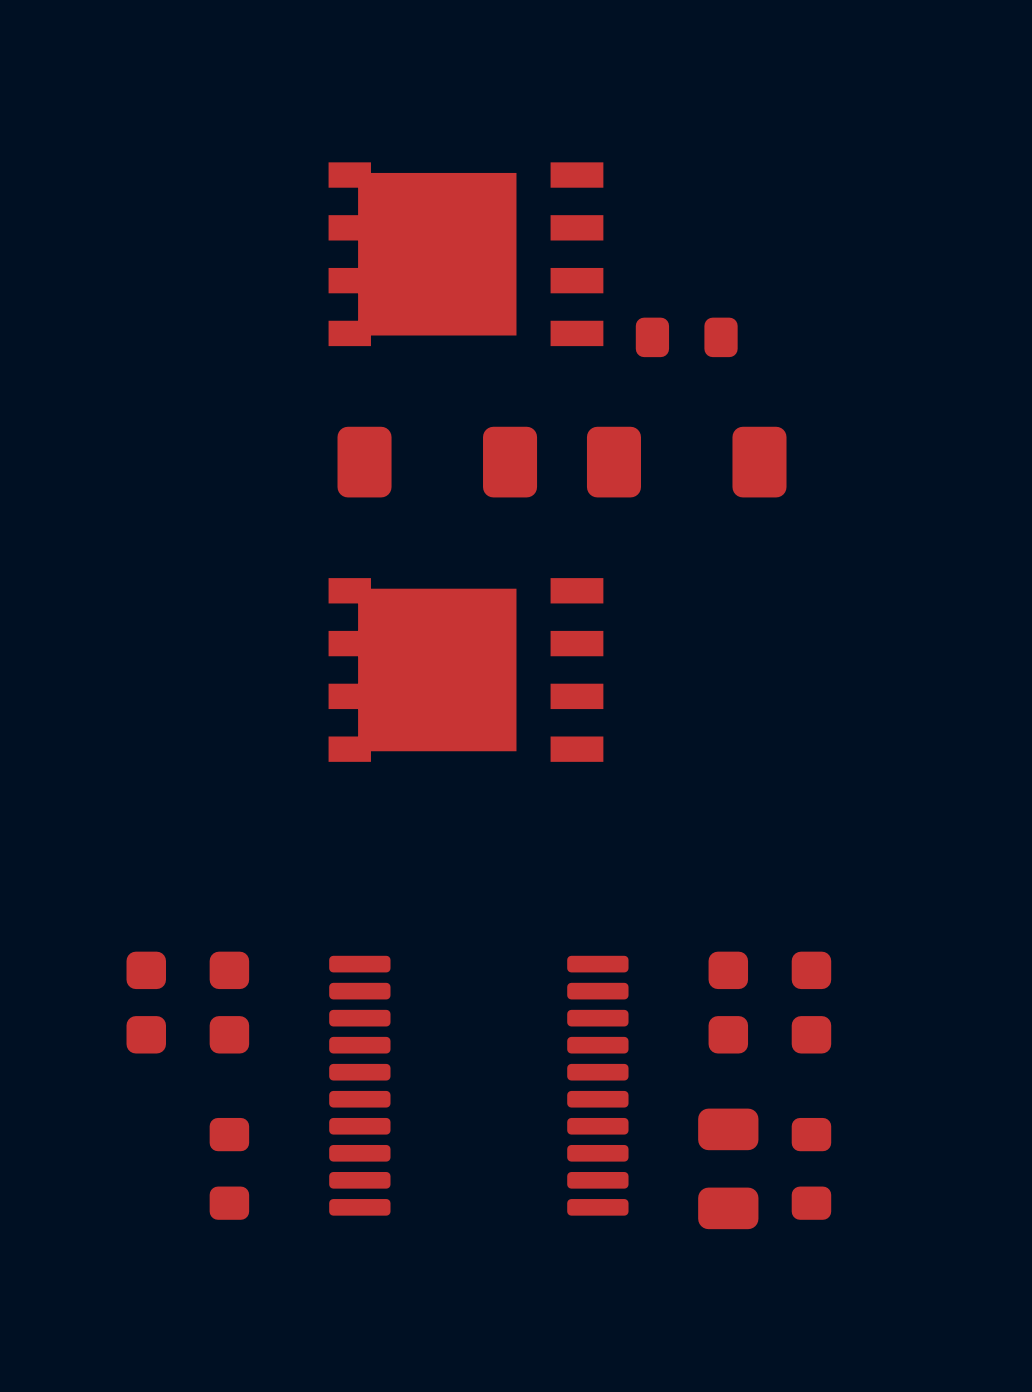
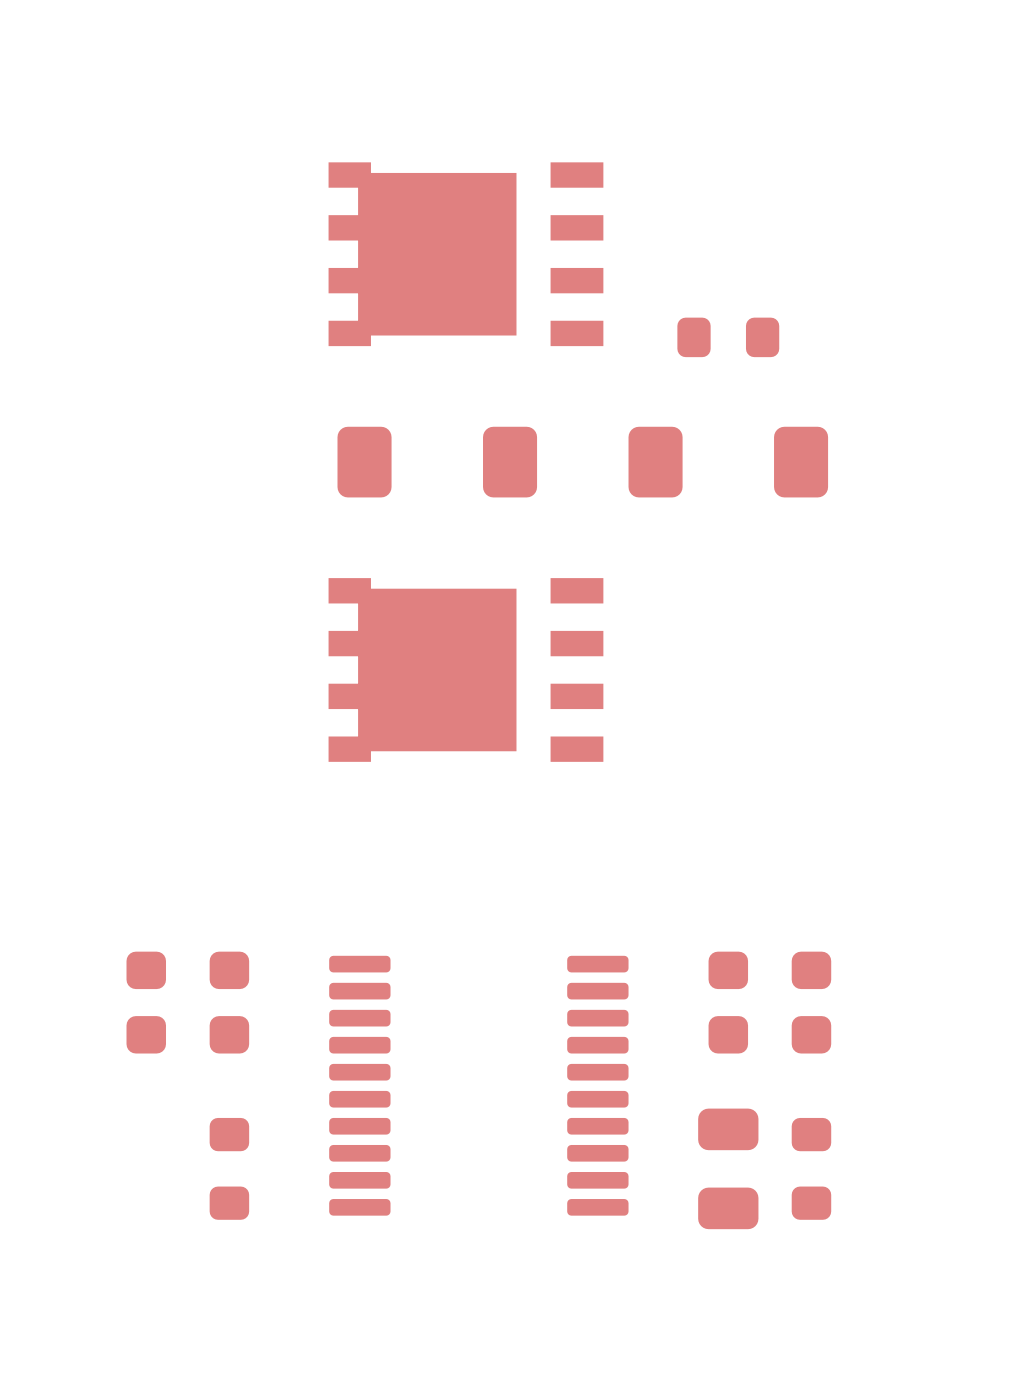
part position: (686, 337) -> (728, 337)
part position: (686, 462) -> (728, 462)

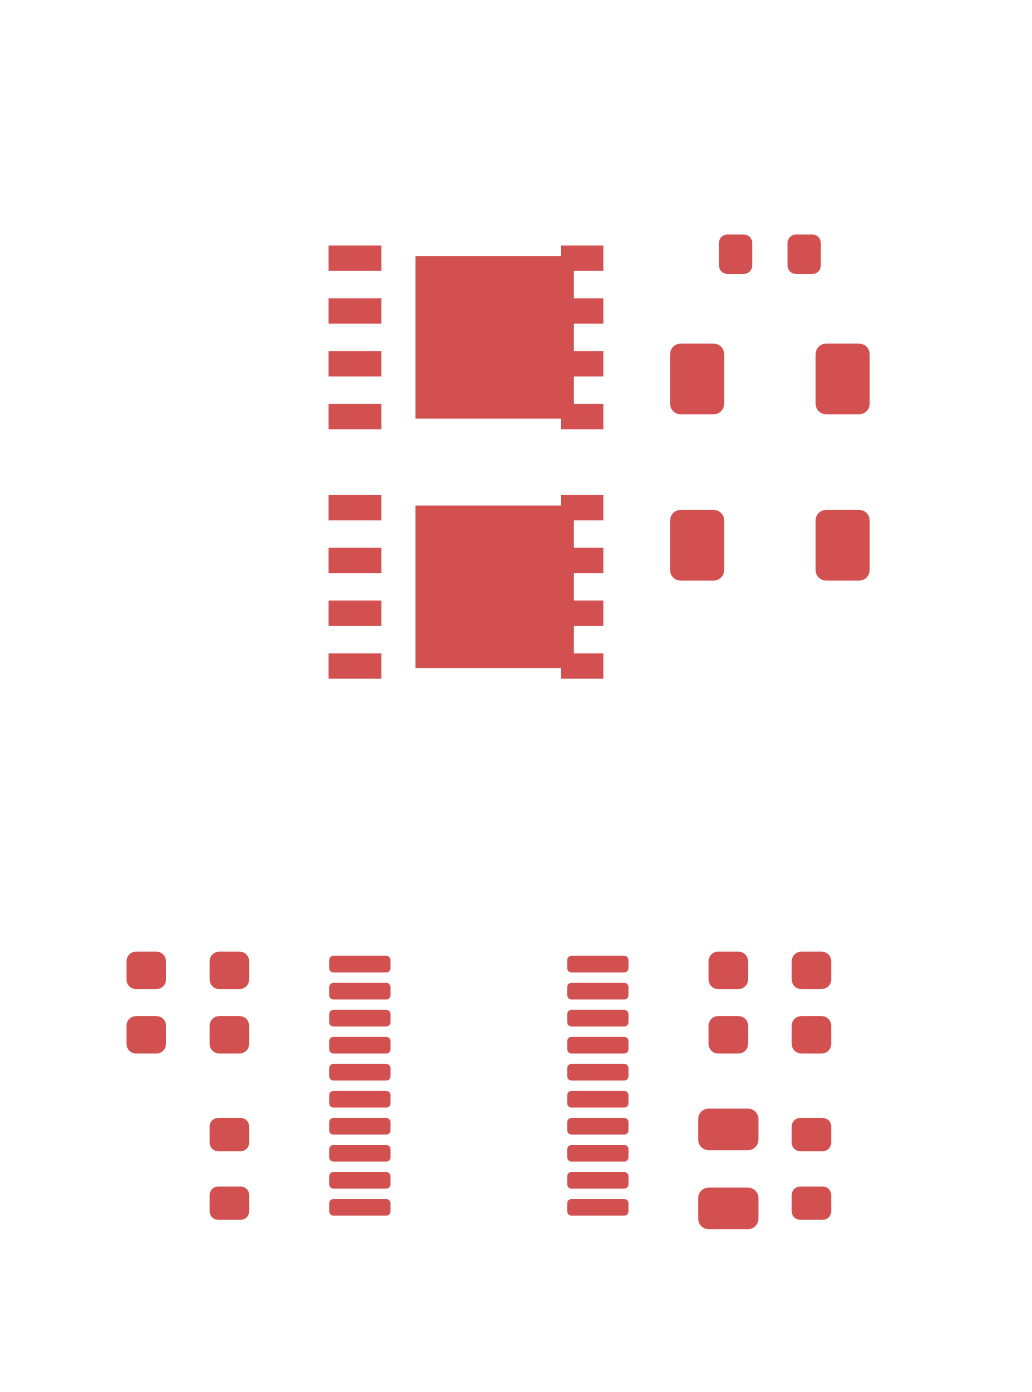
part rotation: 0° (465, 254) -> 180° (465, 337)
part position: (728, 337) -> (769, 254)
part: none -> (769, 378)
part: (437, 462) -> none
part: (728, 462) -> none
part: none -> (769, 545)
part rotation: 0° (465, 669) -> 180° (465, 586)

